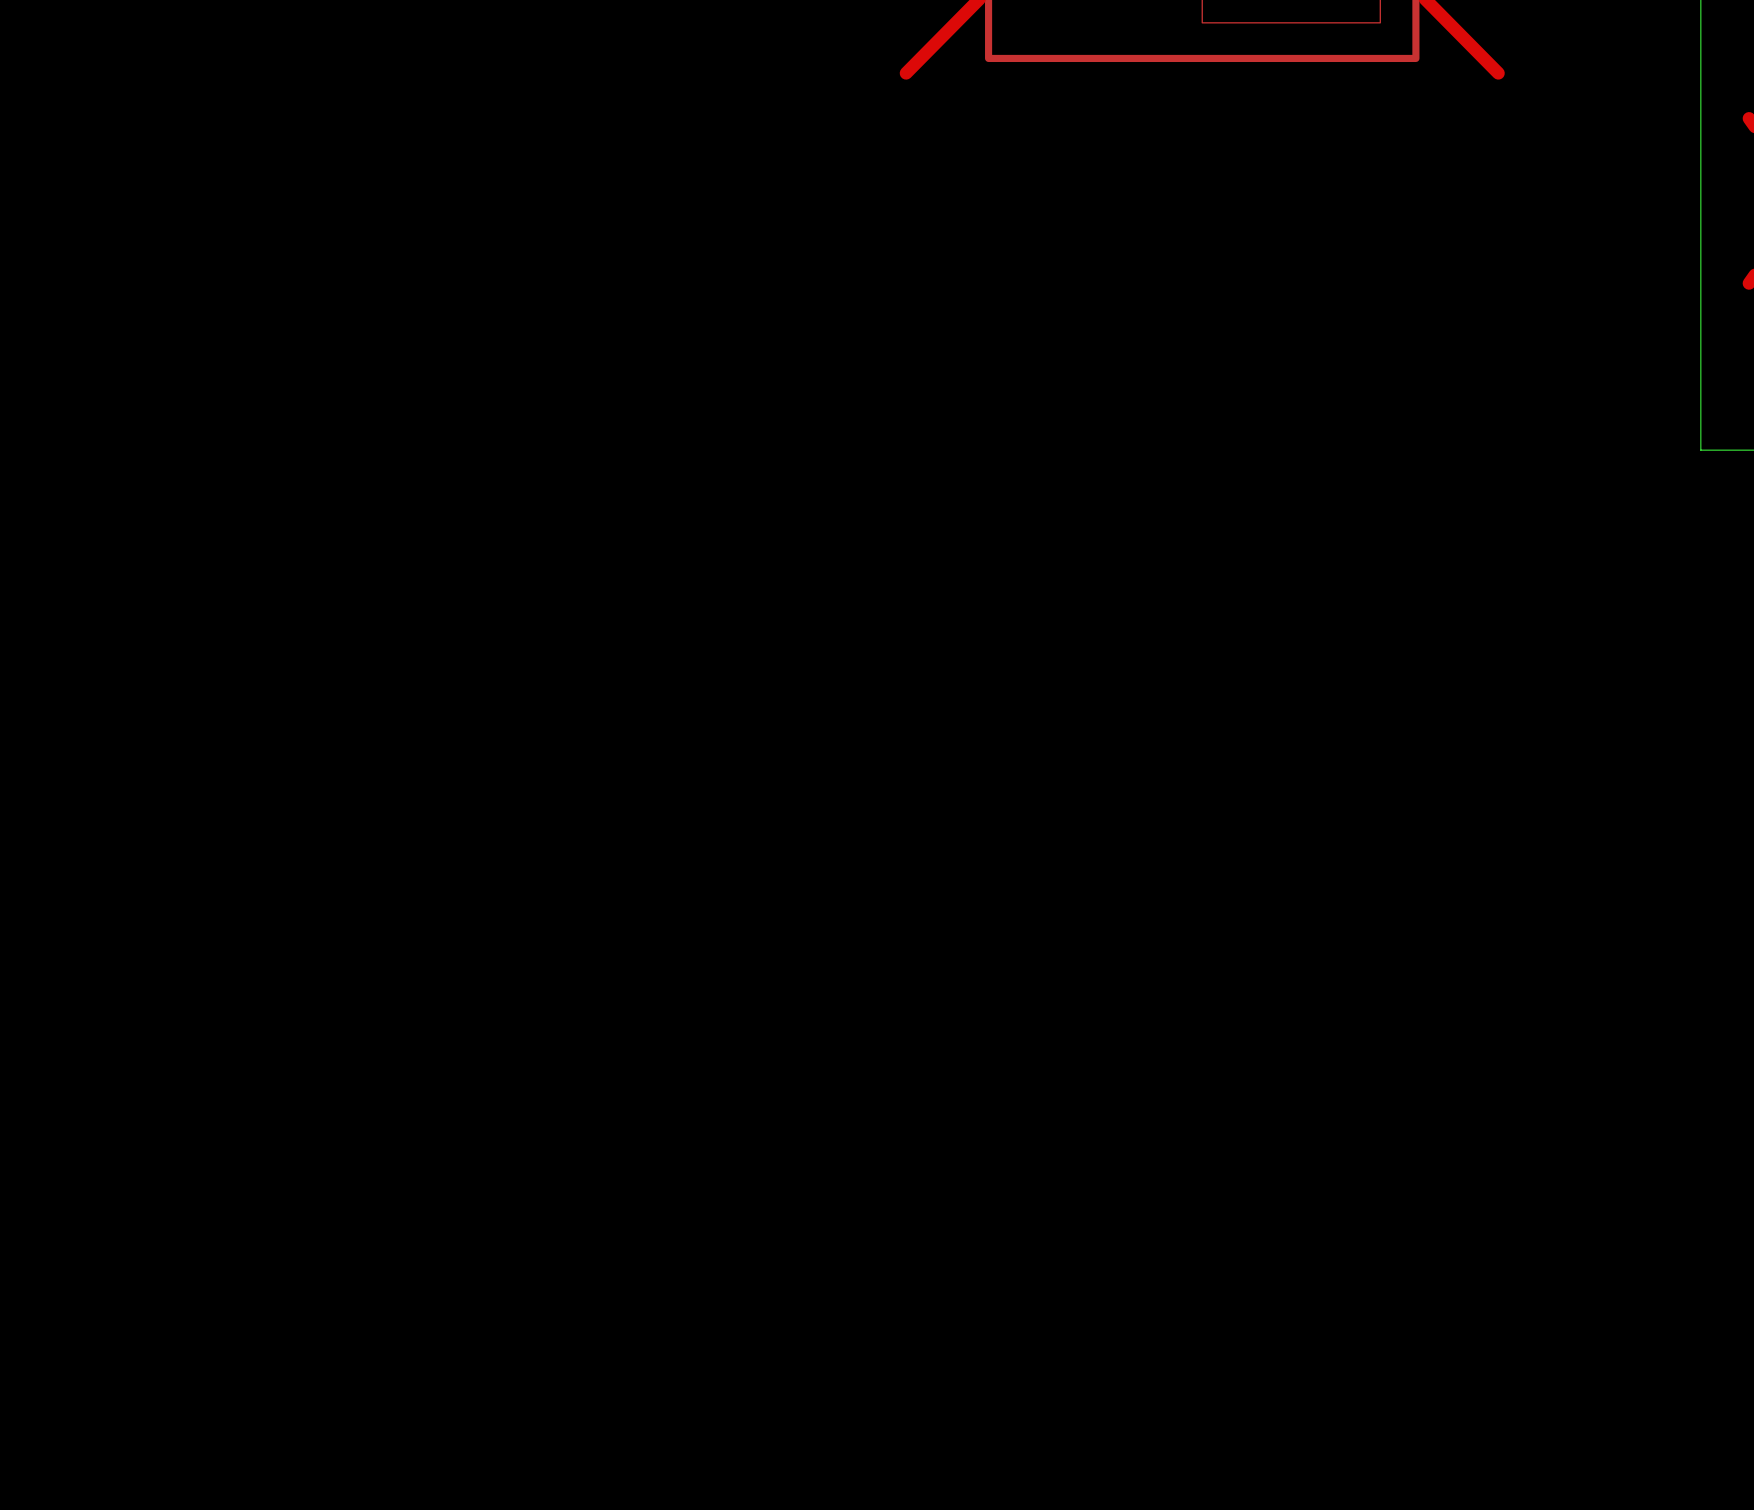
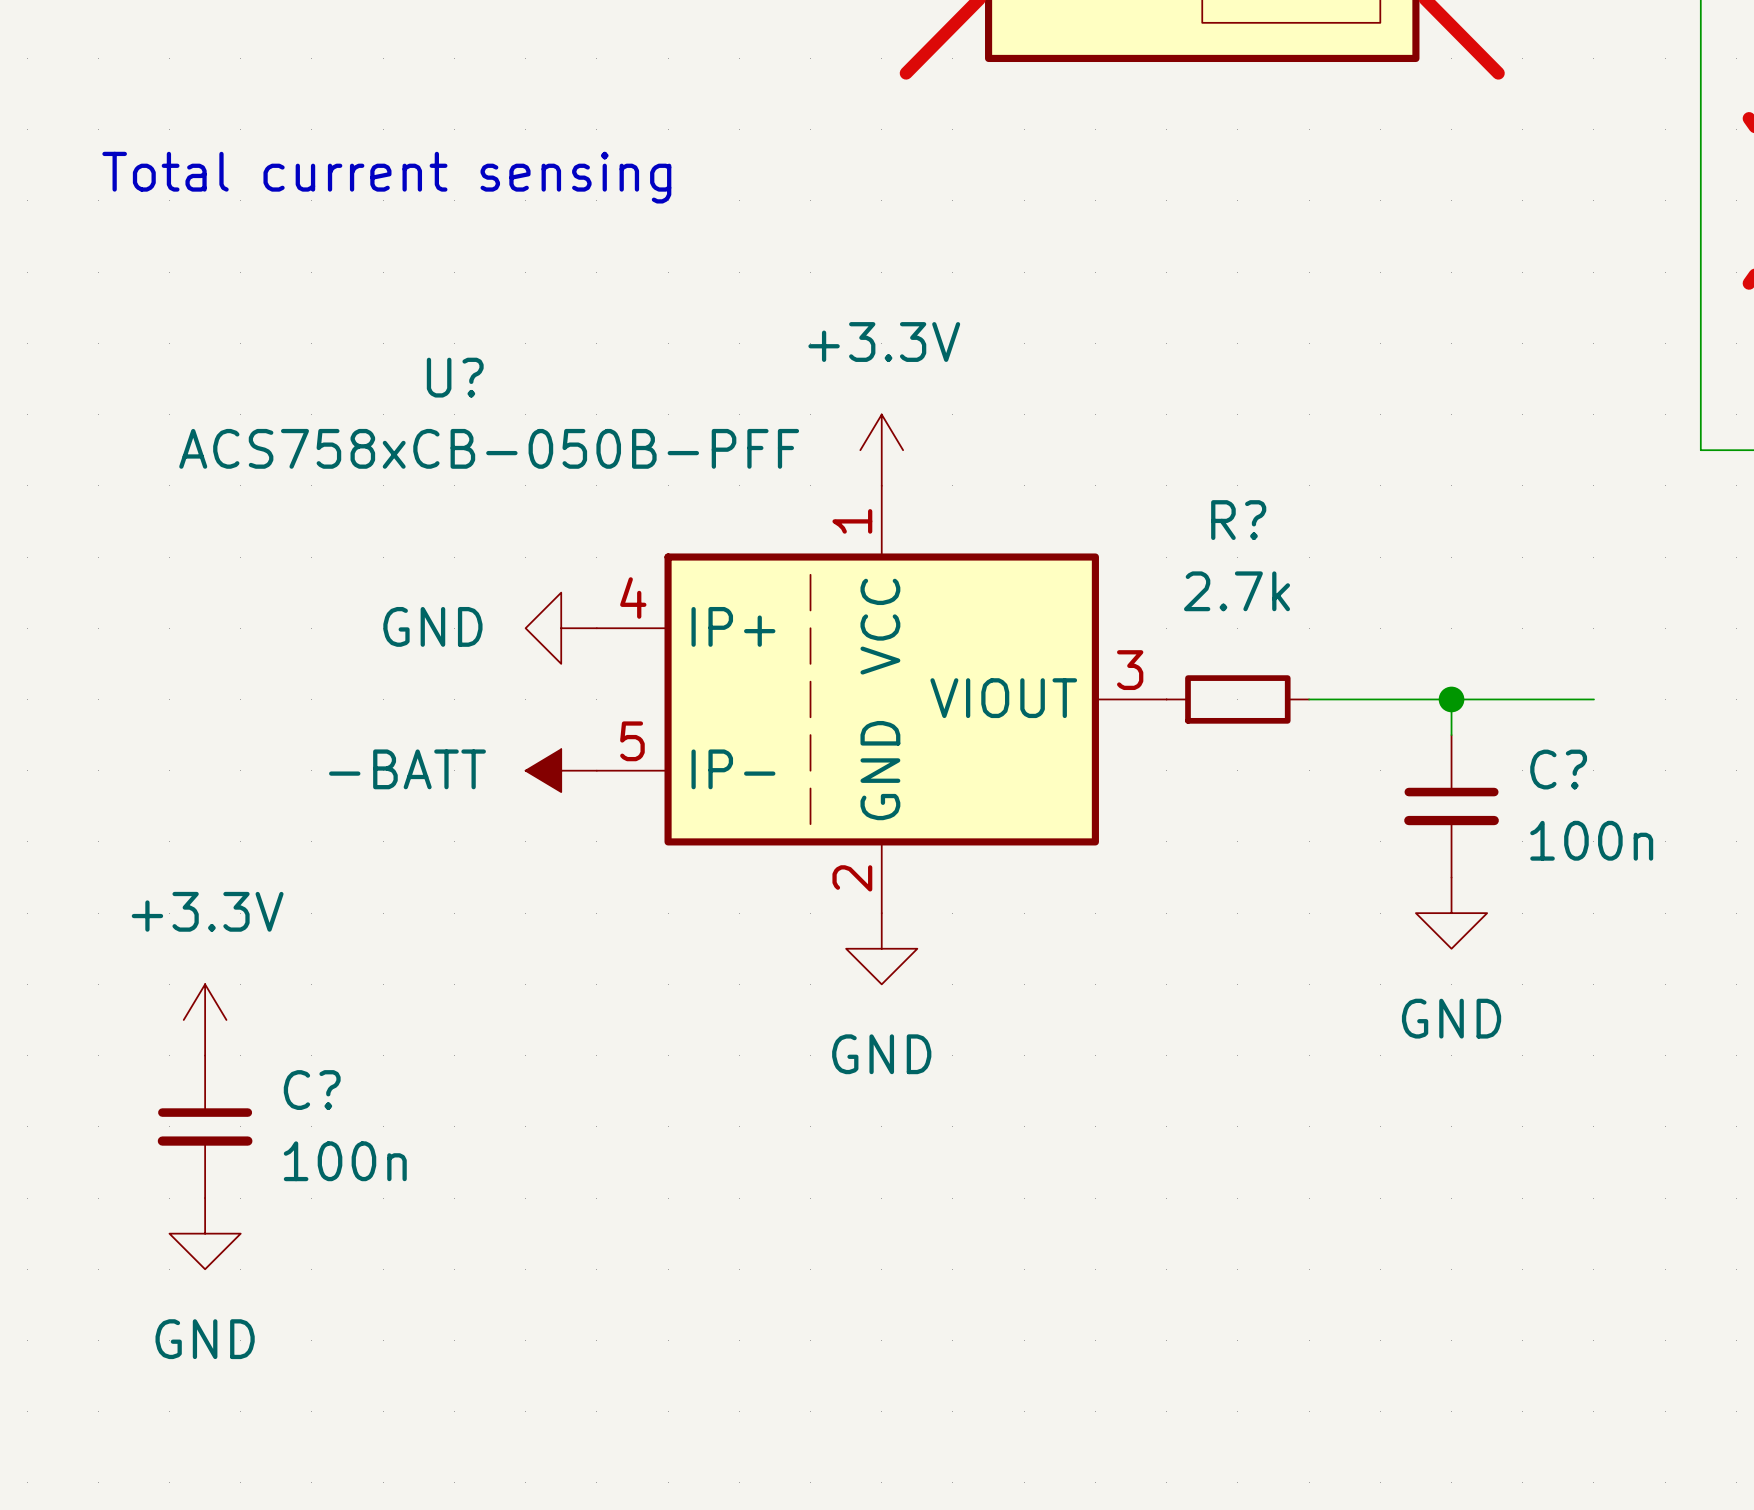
text: none -> Total current sensing (386, 177)
power symbol: none -> +3.3V (881, 450)
power symbol: none -> GND (561, 628)
U?: none -> ACS758xCB-050B-PFF (881, 699)
R?: none -> 2.7k (1237, 699)
wire: none -> (1309, 699) (1593, 699)
wire: none -> (1451, 699) (1451, 735)
junction: none -> (1451, 699)
power symbol: none -> -BATT (561, 770)
C?: none -> 100n (1451, 806)
power symbol: none -> GND (1451, 913)
power symbol: none -> GND (881, 948)
power symbol: none -> +3.3V (205, 1019)
C?: none -> 100n (205, 1126)
power symbol: none -> GND (205, 1233)

